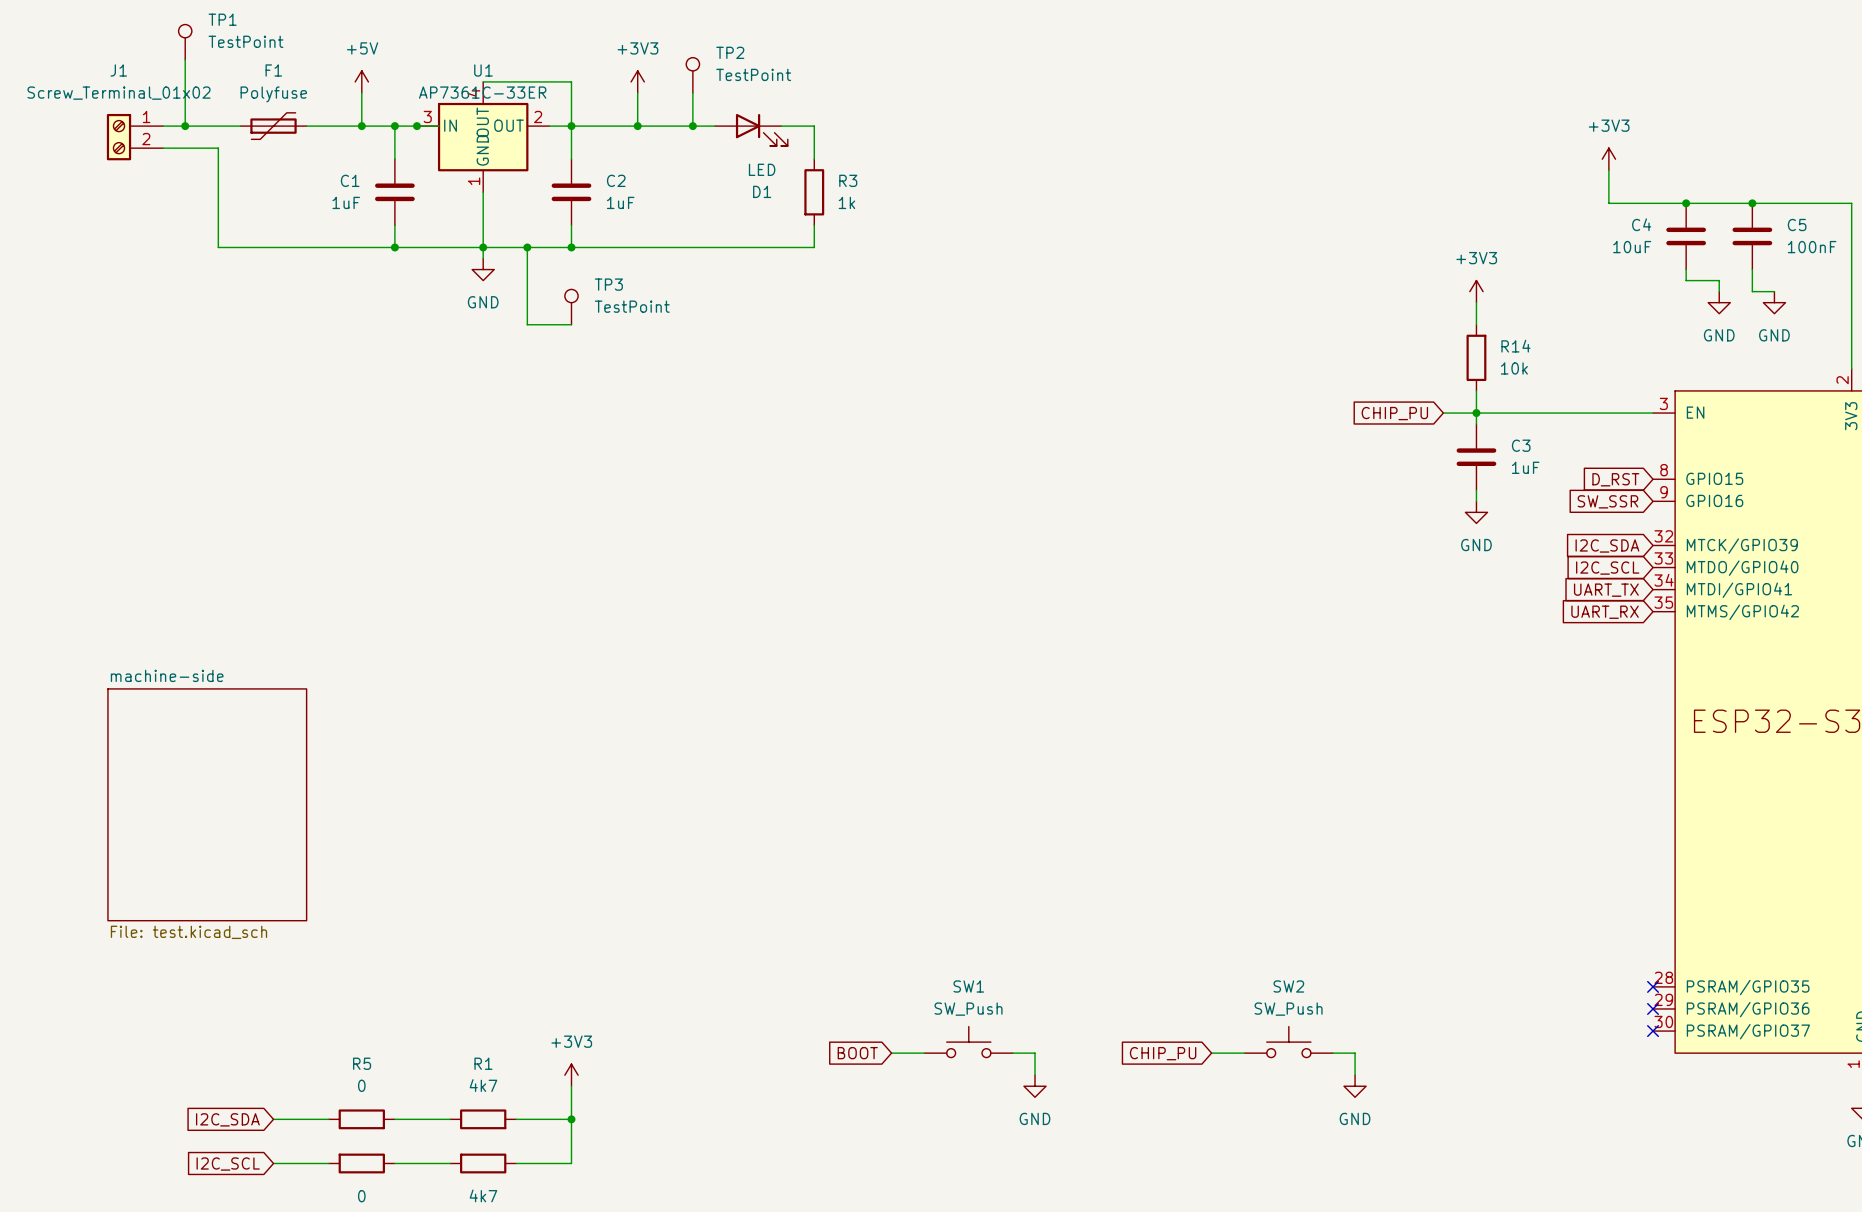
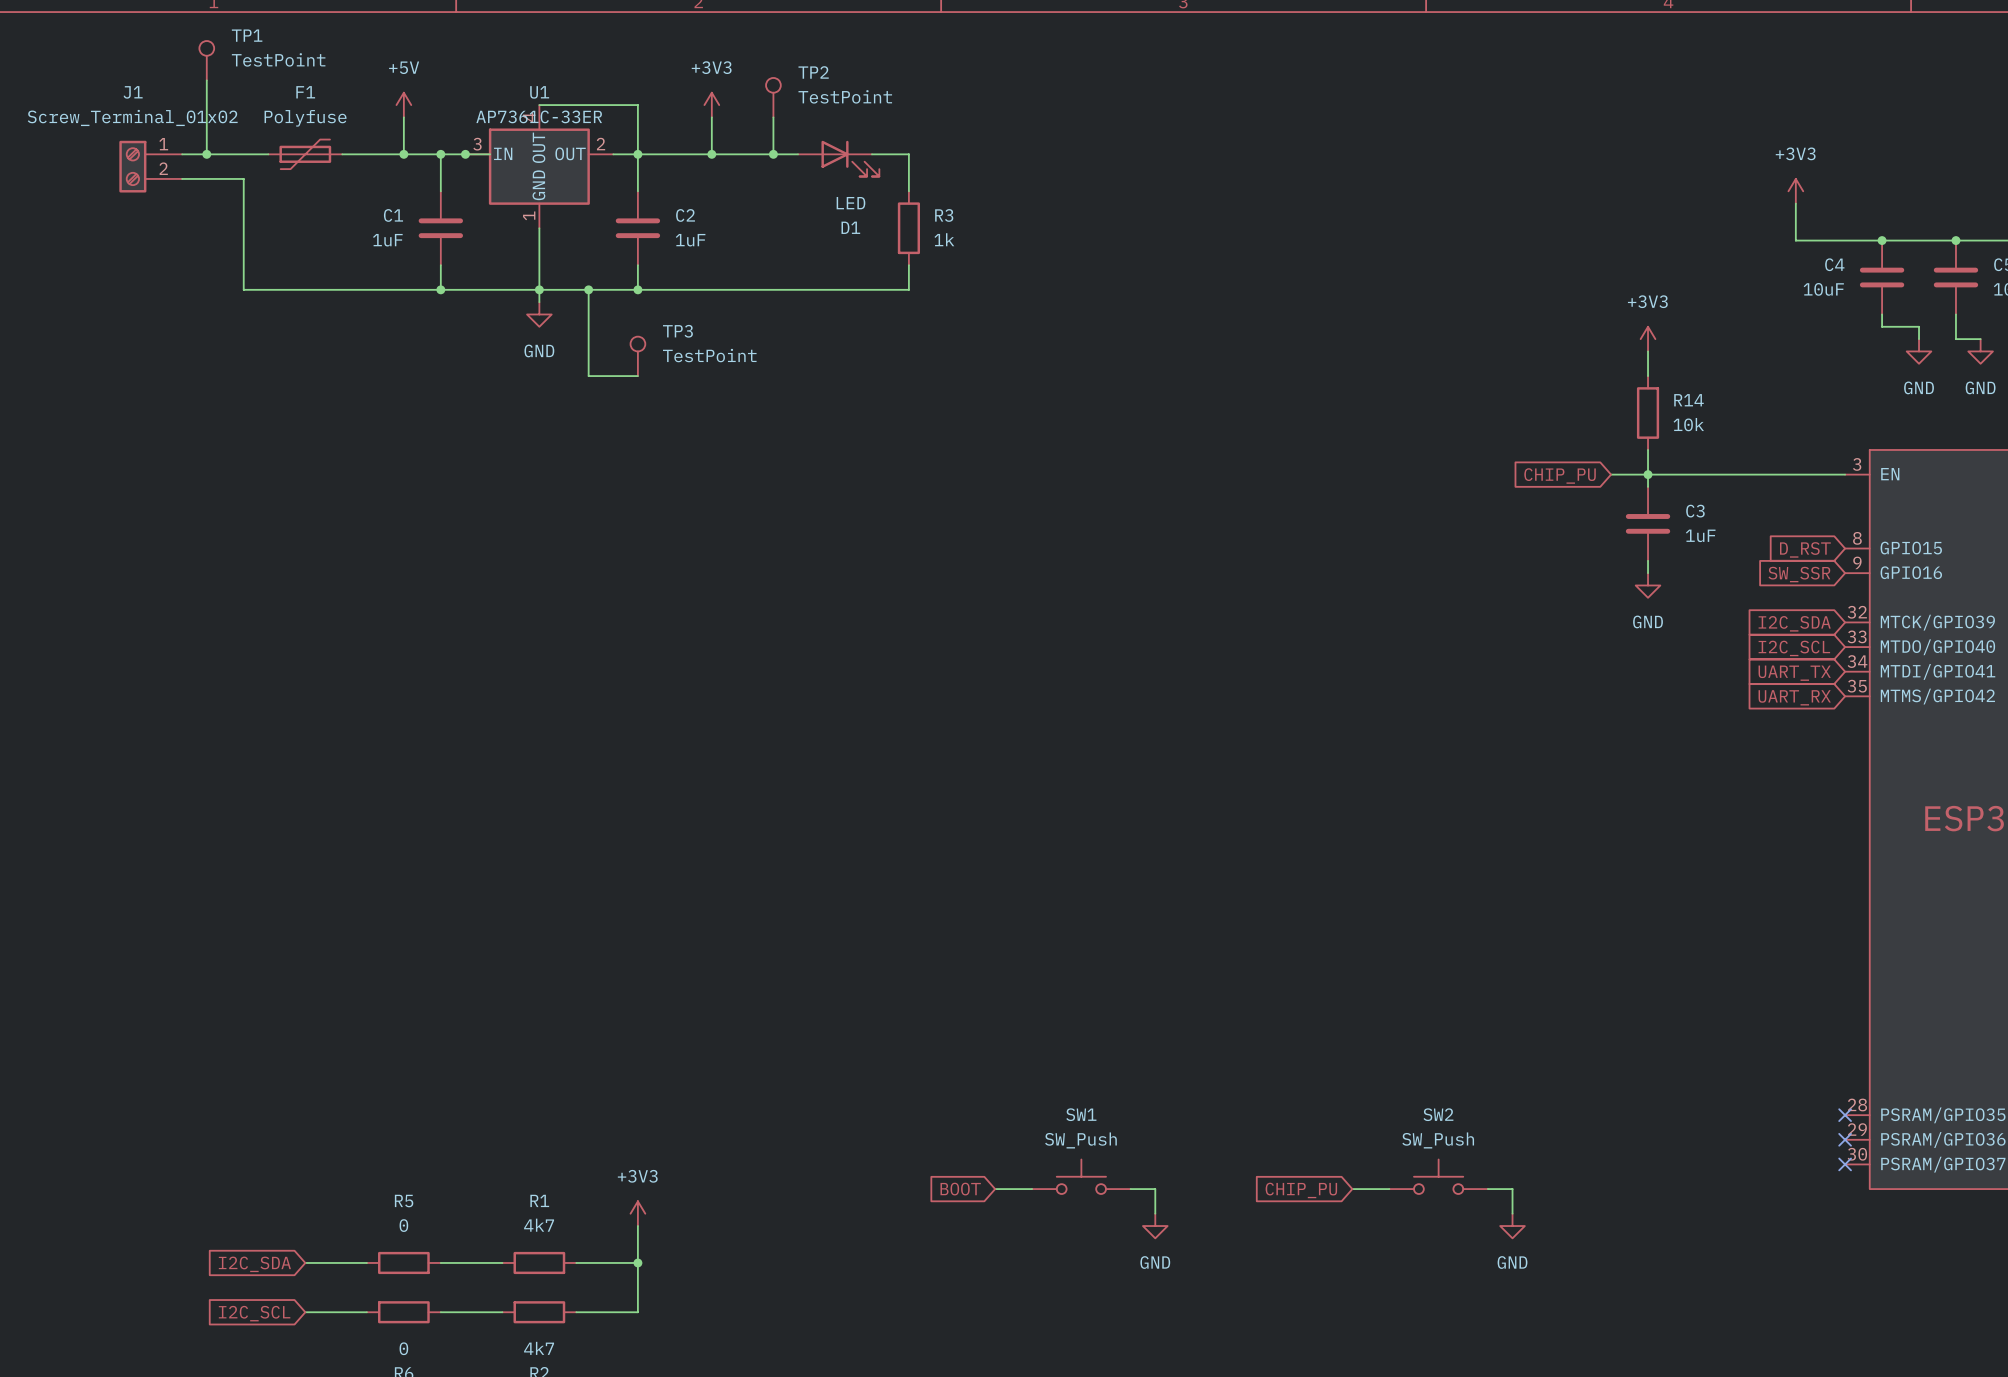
sheet machine-side: File: test.kicad_sch (207, 804) -> none

